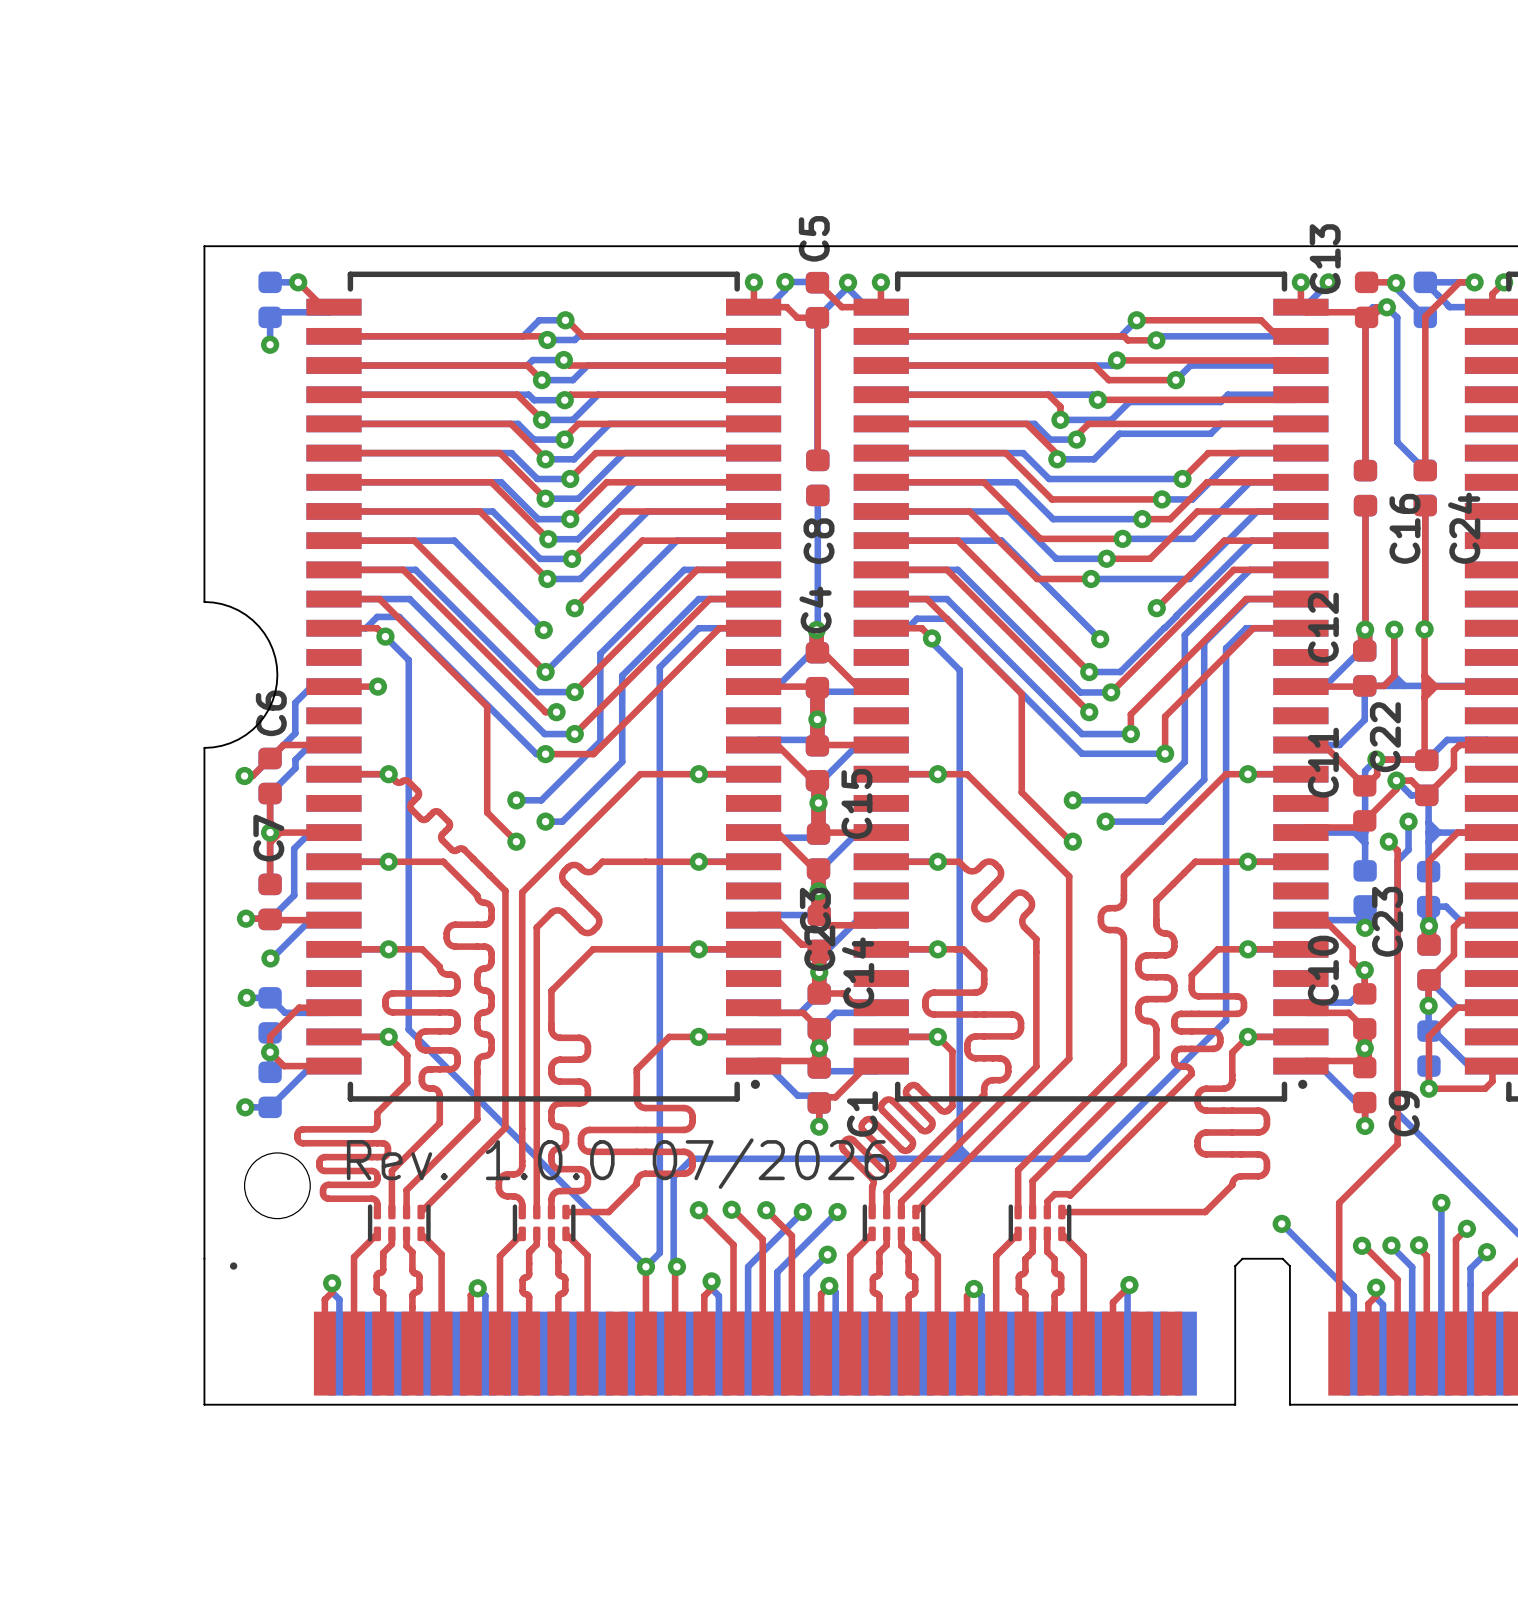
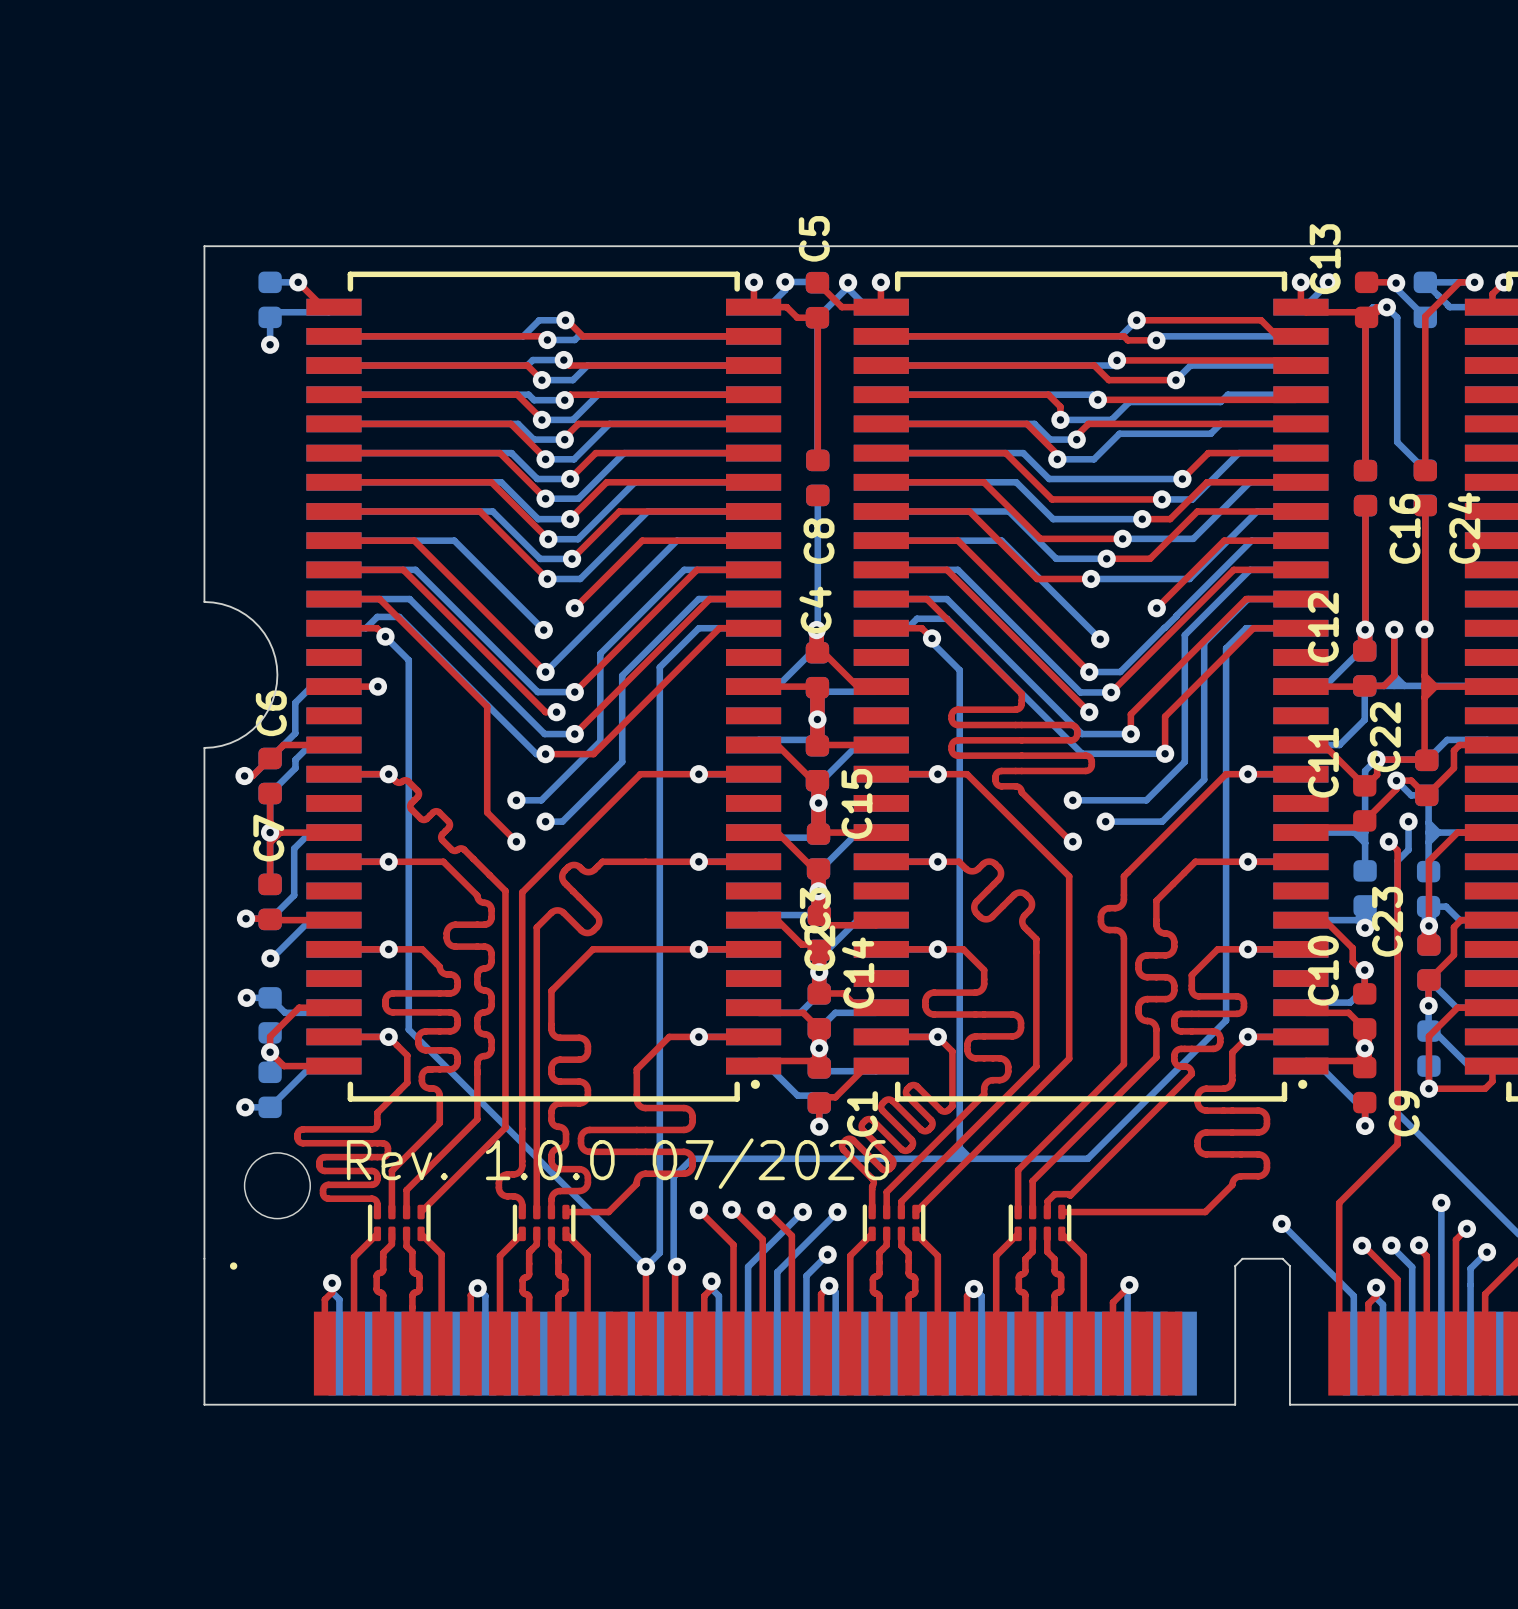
top track: (1021, 703) (1021, 792) -> (1021, 703) (1017, 709) (957, 709) (953, 711) (951, 715) (952, 722) (957, 724) (1071, 725) (1075, 726) (1077, 735) (1071, 740) (957, 740) (953, 742) (952, 751) (957, 755) (1085, 755) (1091, 759) (1091, 766) (1086, 770) (1001, 770) (996, 773) (995, 780) (997, 784) (1017, 786) (1021, 792)

